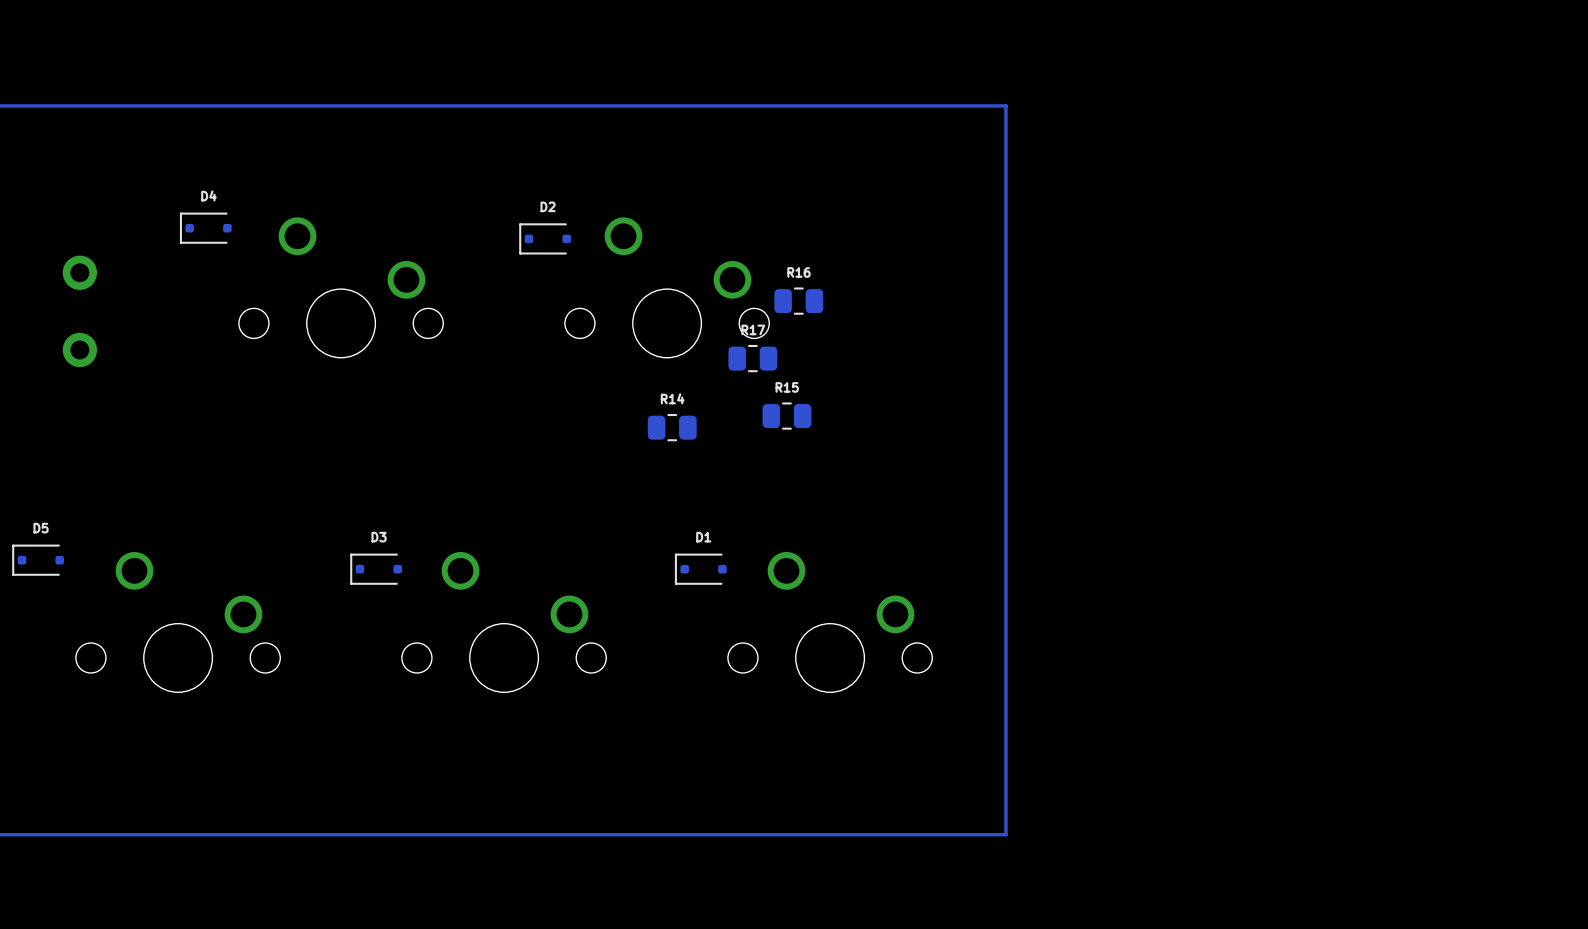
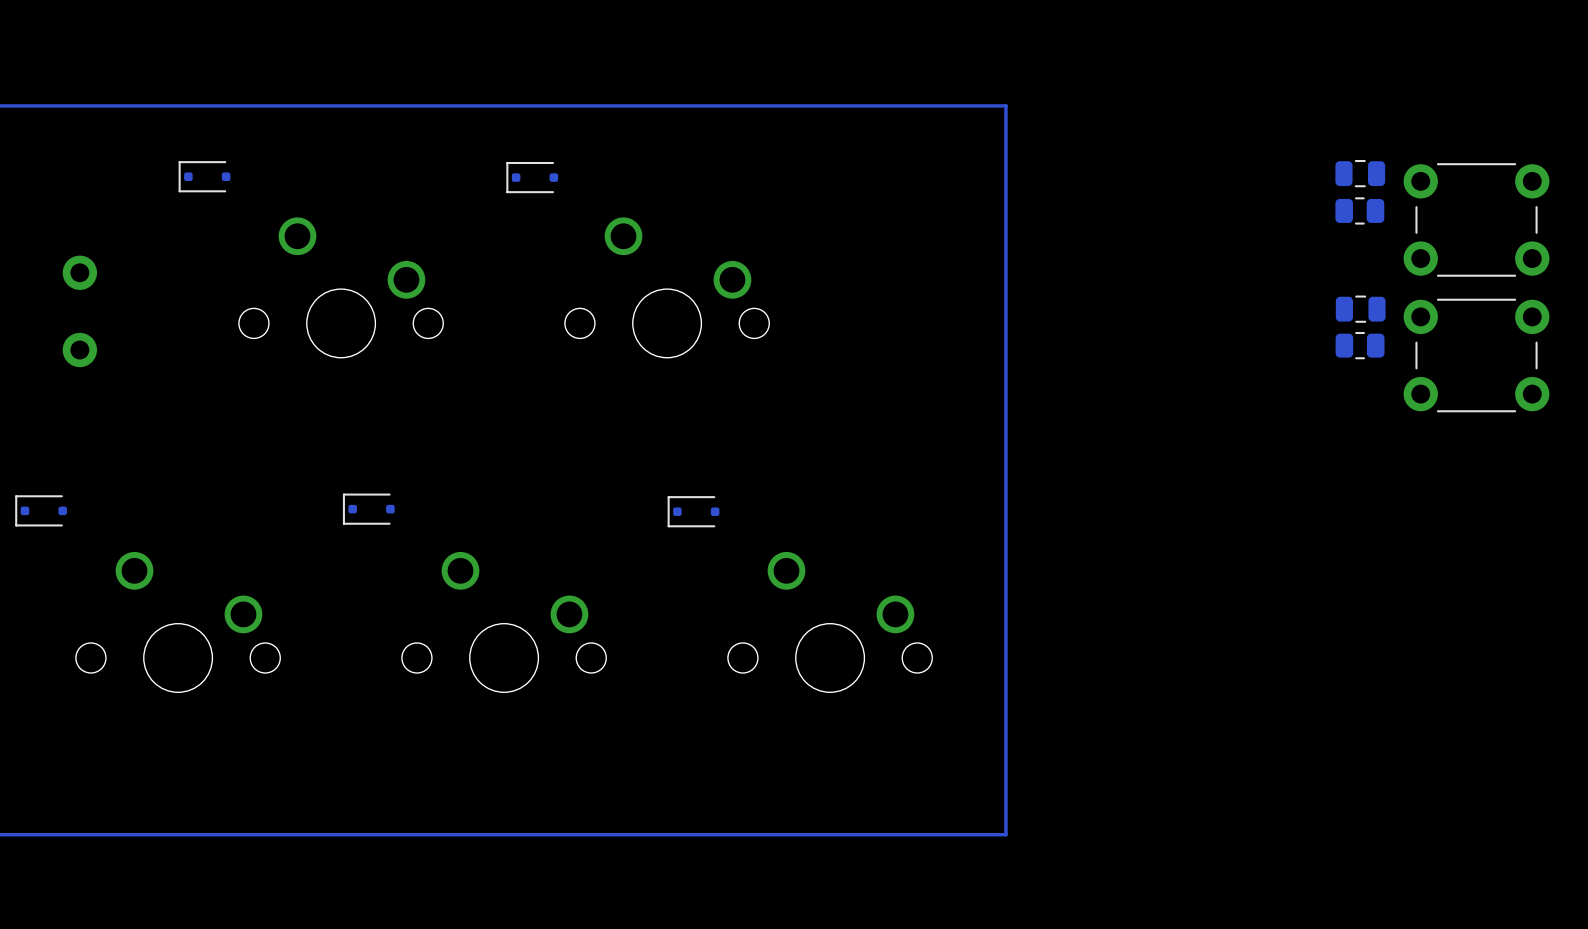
part: none -> (1360, 173)
part: none -> (204, 176)
part: none -> (532, 177)
part: none -> (1359, 210)
part: none -> (1476, 219)
D4: (205, 228) -> none
D2: (545, 238) -> none
R16: (798, 301) -> none
part: none -> (1360, 309)
part: none -> (1360, 345)
part: none -> (1476, 355)
R17: (752, 358) -> none
R15: (786, 416) -> none
R14: (672, 427) -> none
part: none -> (368, 509)
part: none -> (41, 510)
part: none -> (693, 511)
D5: (38, 560) -> none
D3: (376, 569) -> none
D1: (700, 569) -> none

